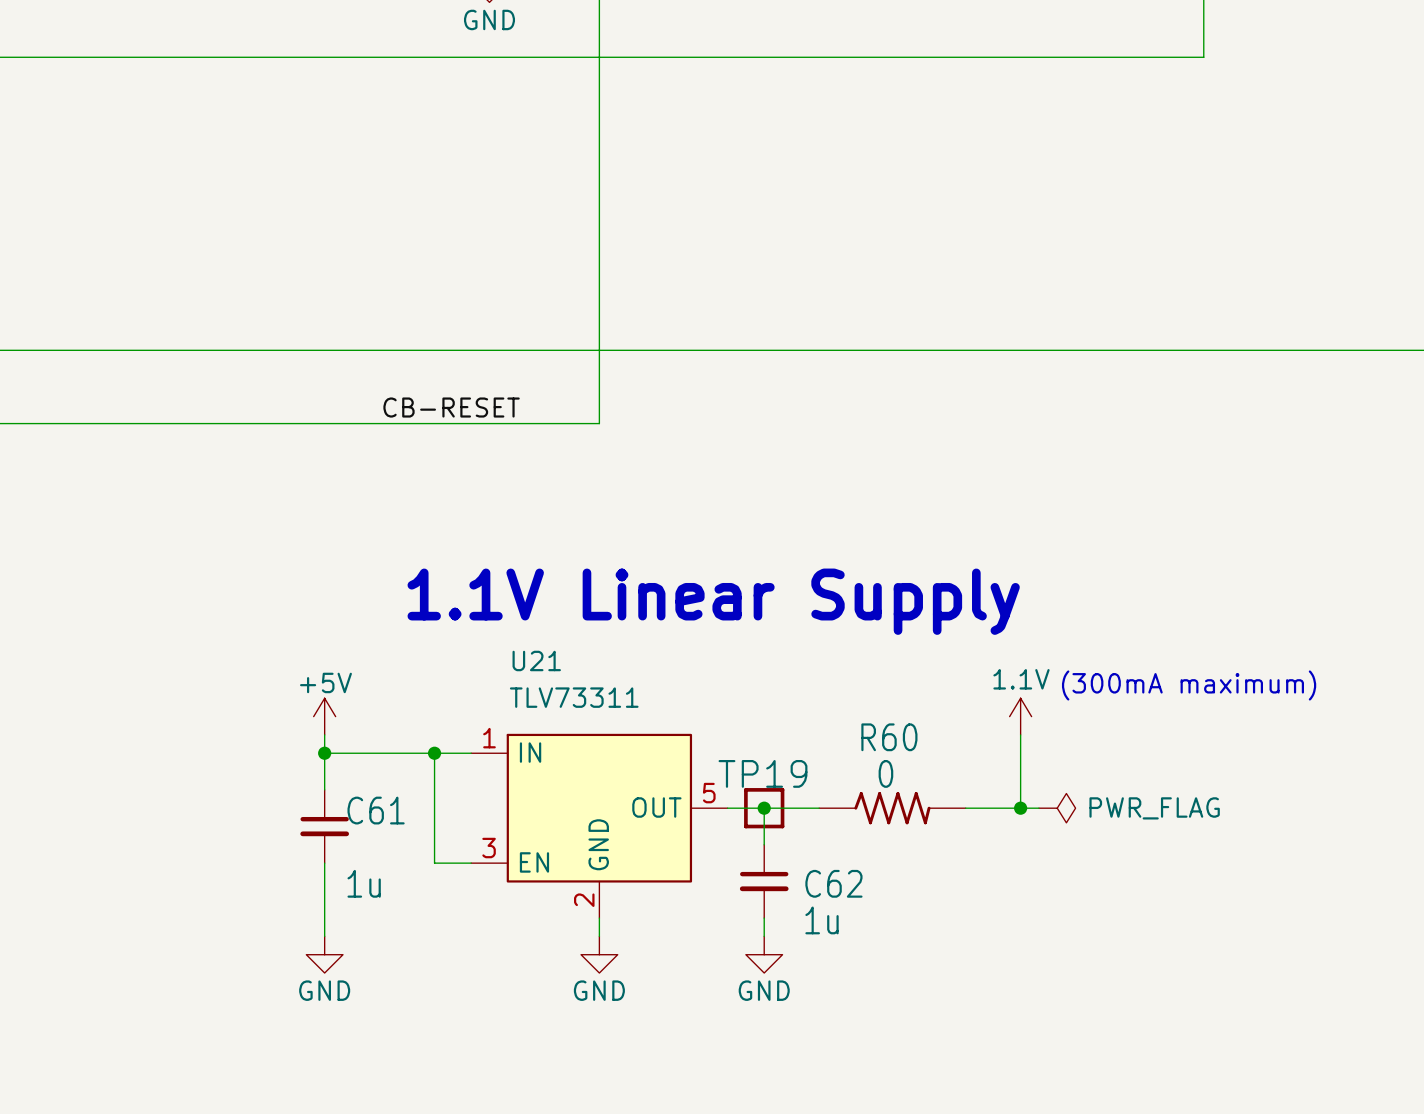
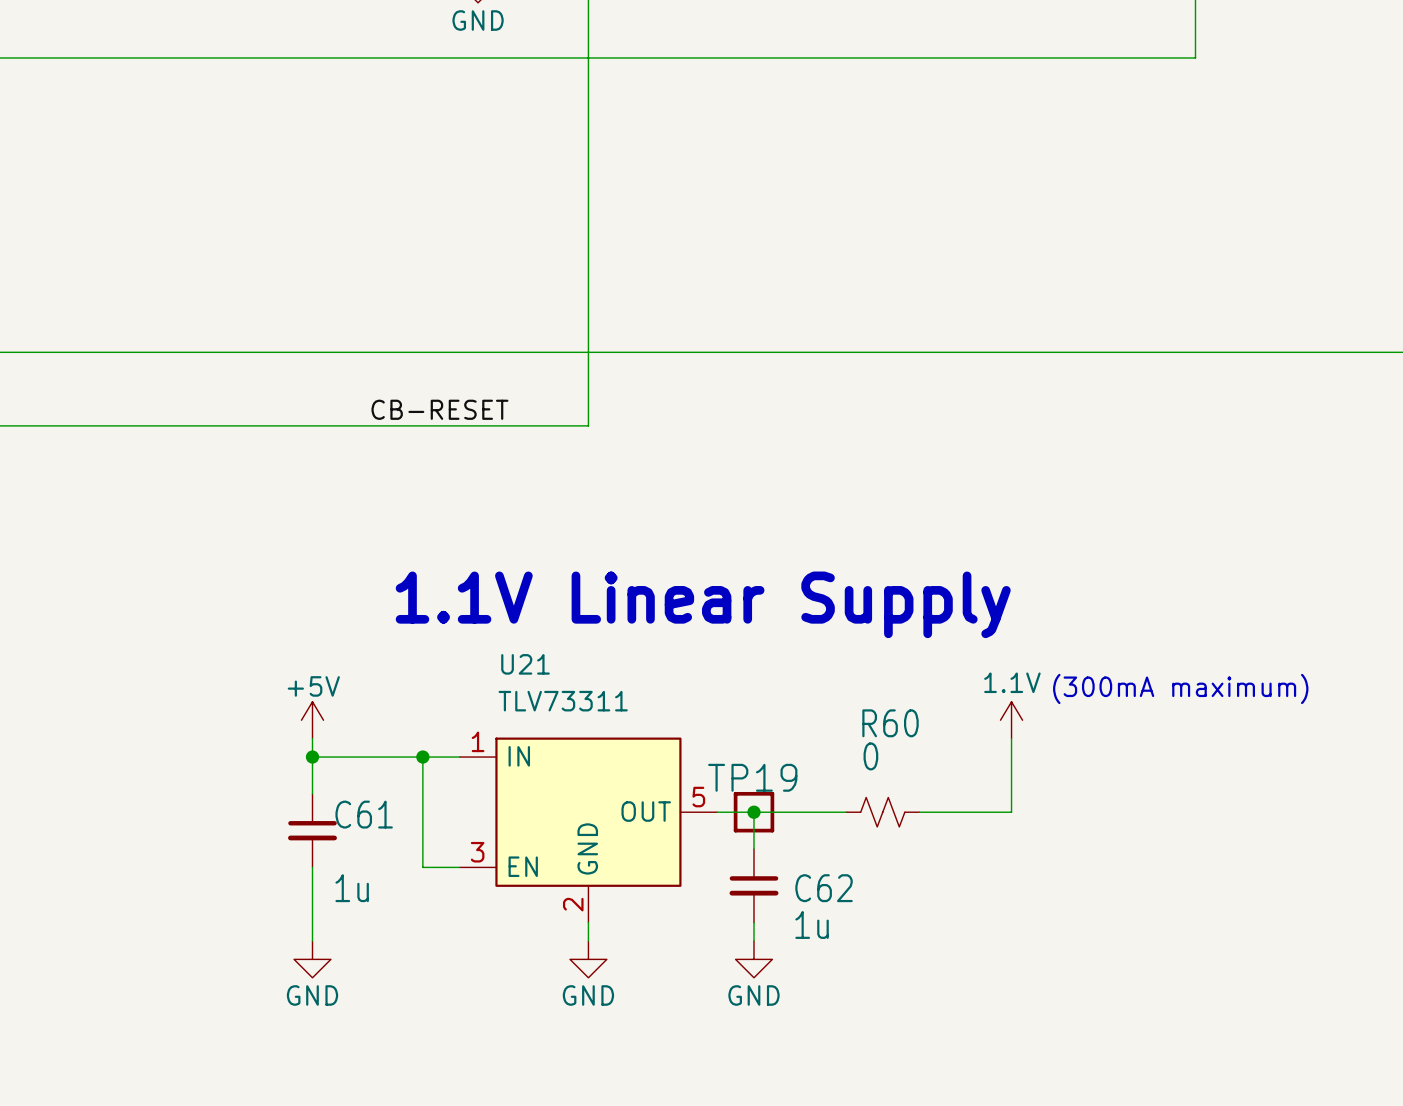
R60 symbol: [819, 792, 966, 825] -> [845, 797, 920, 827]
wire: (1020, 808) (1038, 808) -> none
junction: (1020, 808) -> none
power symbol: PWR_FLAG (1057, 808) -> none

